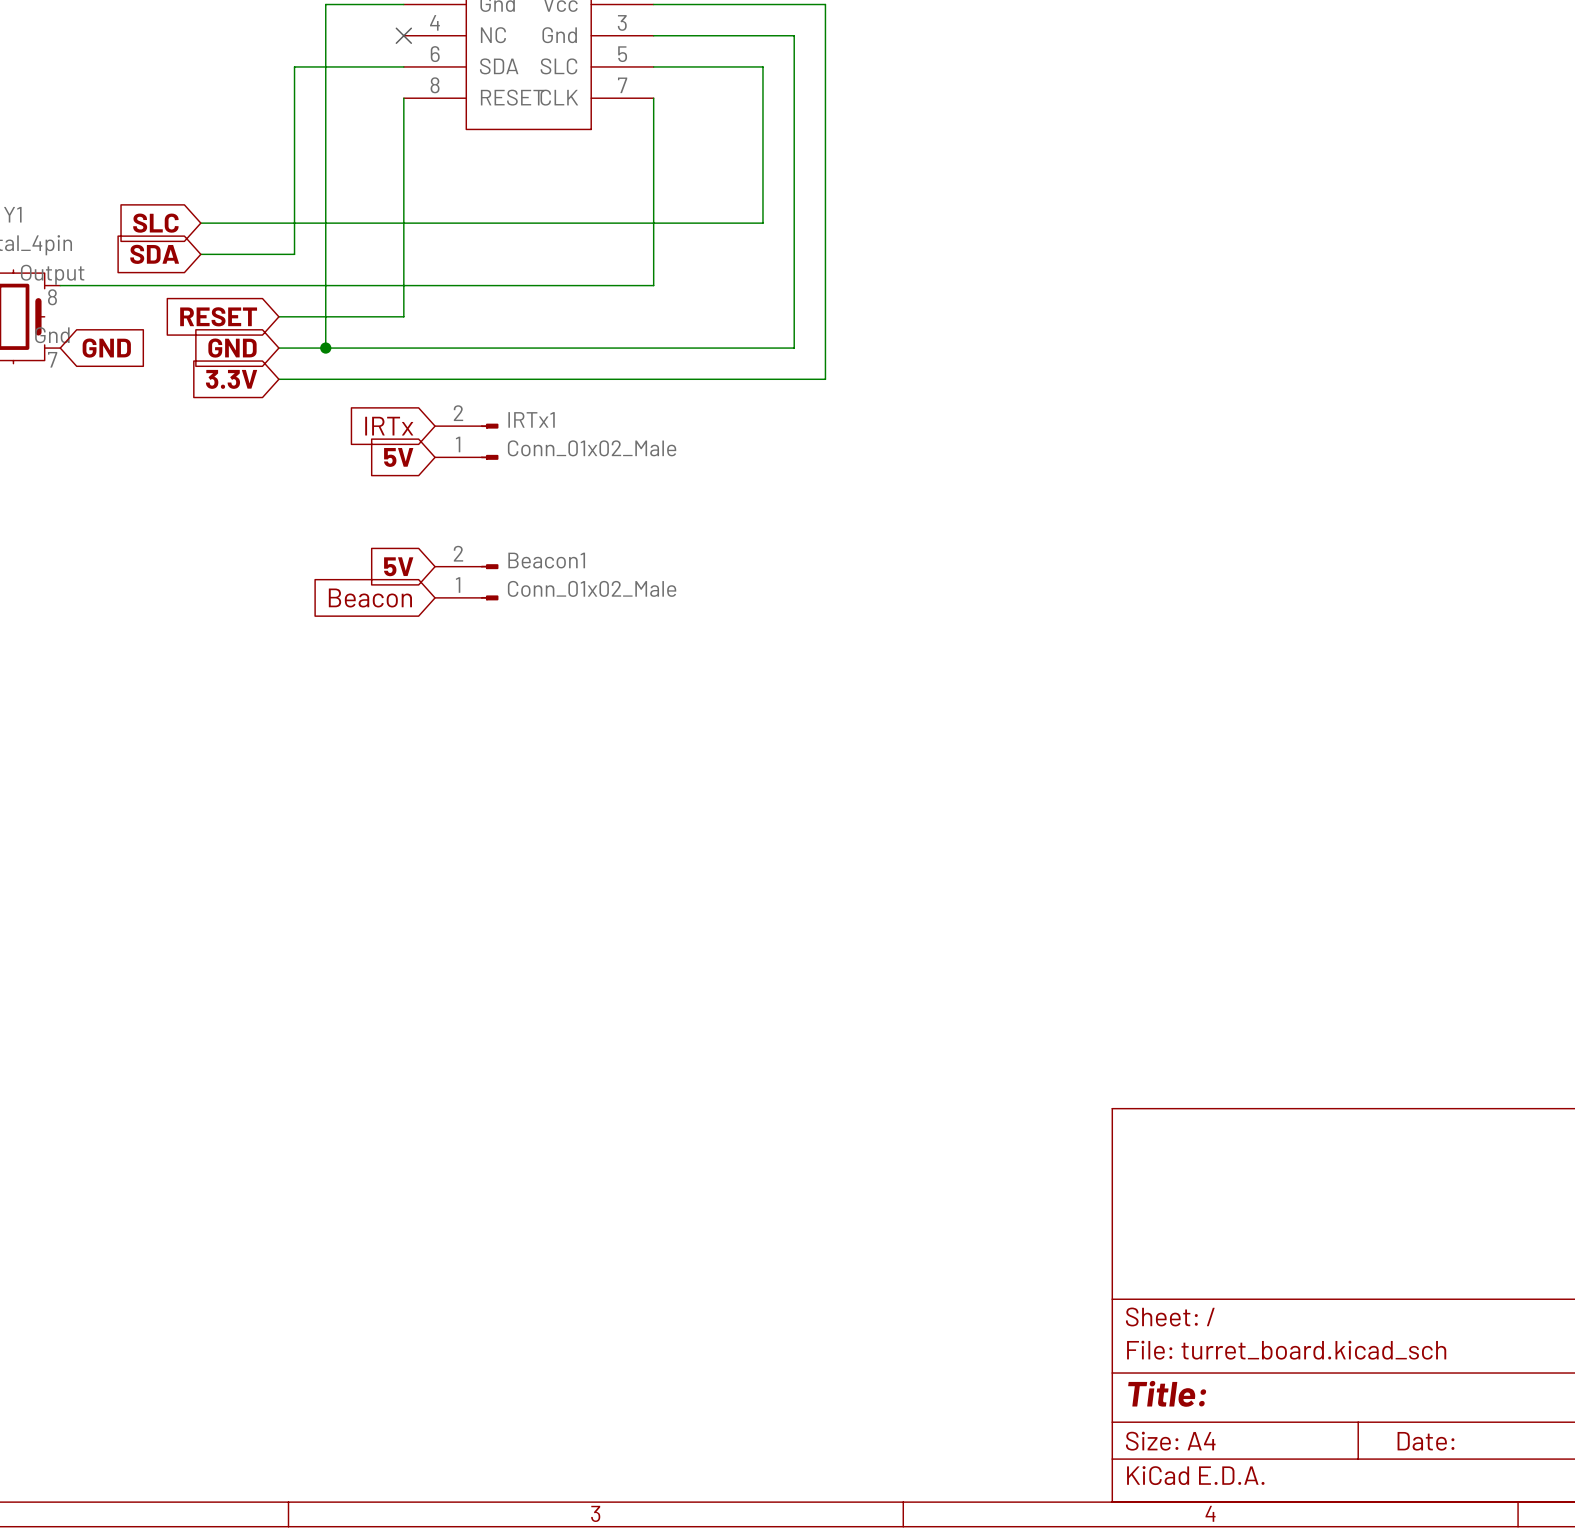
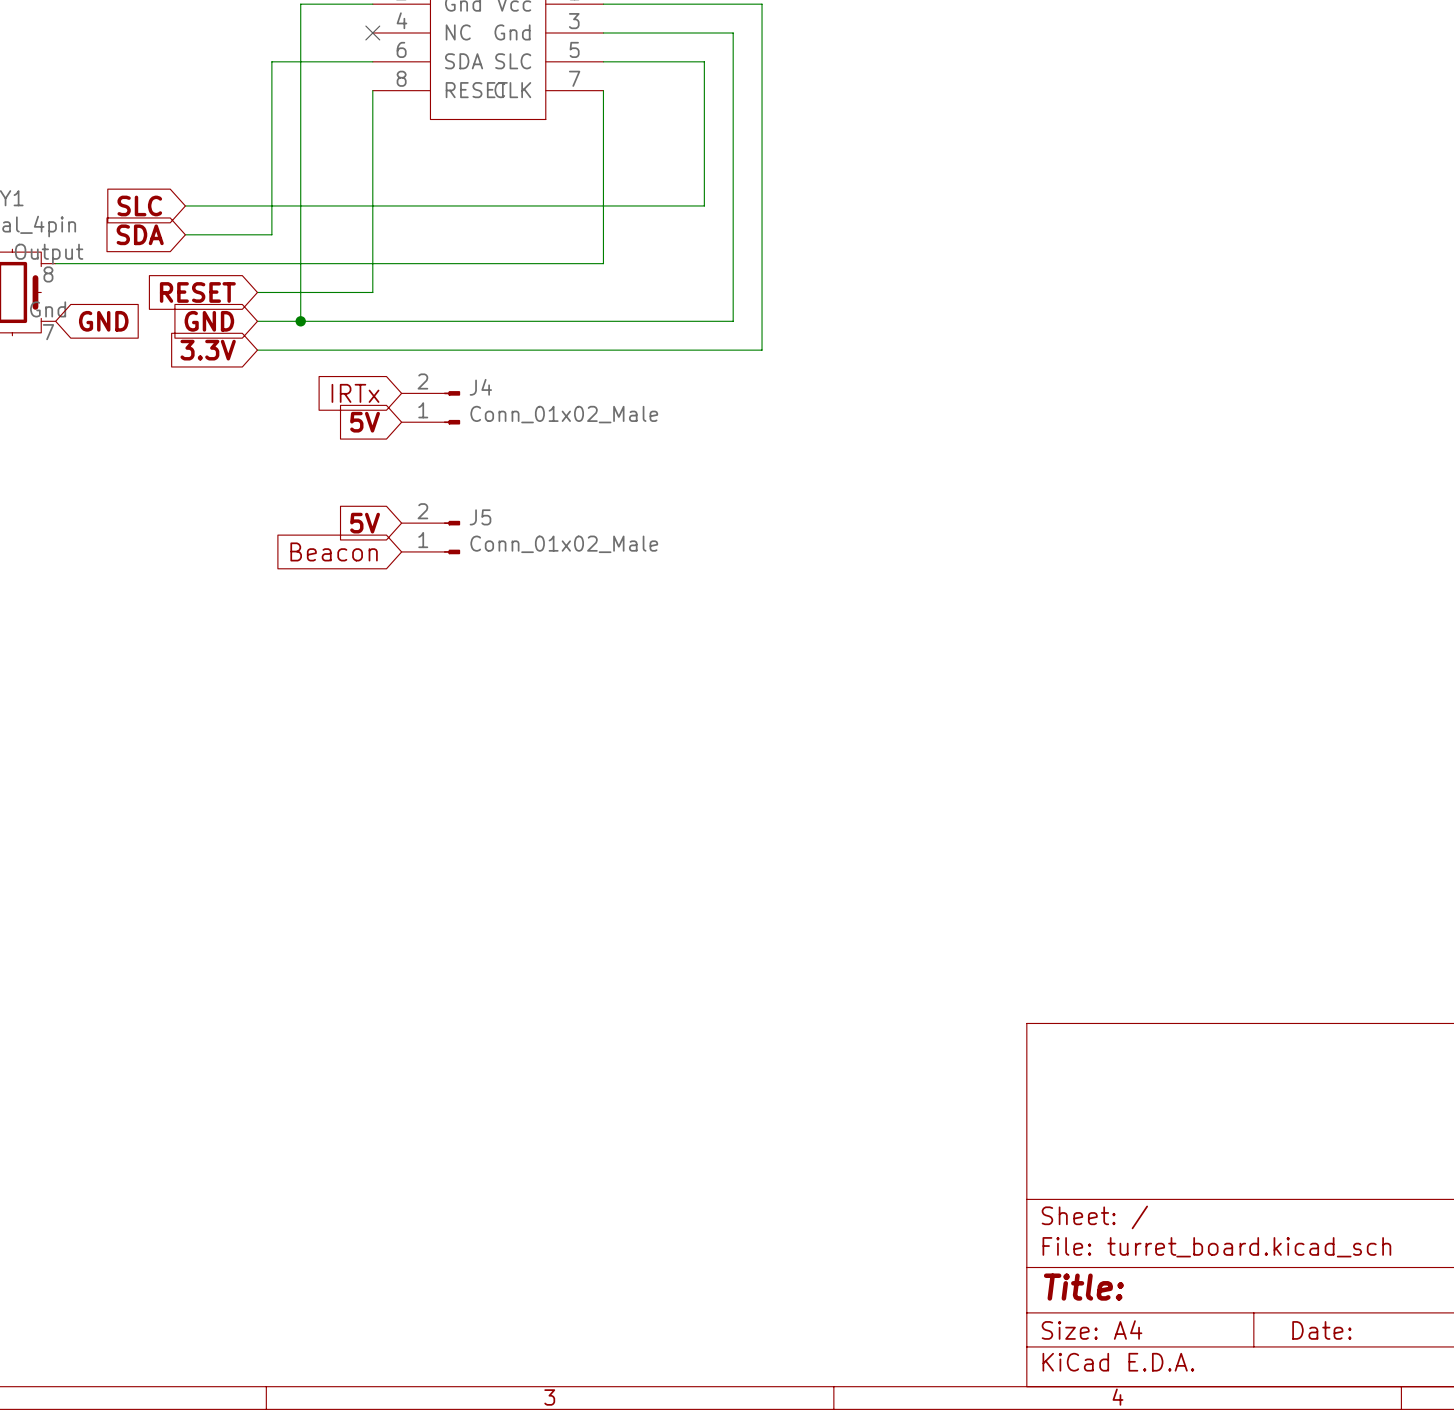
IRTx1 name: IRTx1 (531, 419) -> J4 (480, 387)
Beacon1 name: Beacon1 (546, 560) -> J5 (480, 517)

